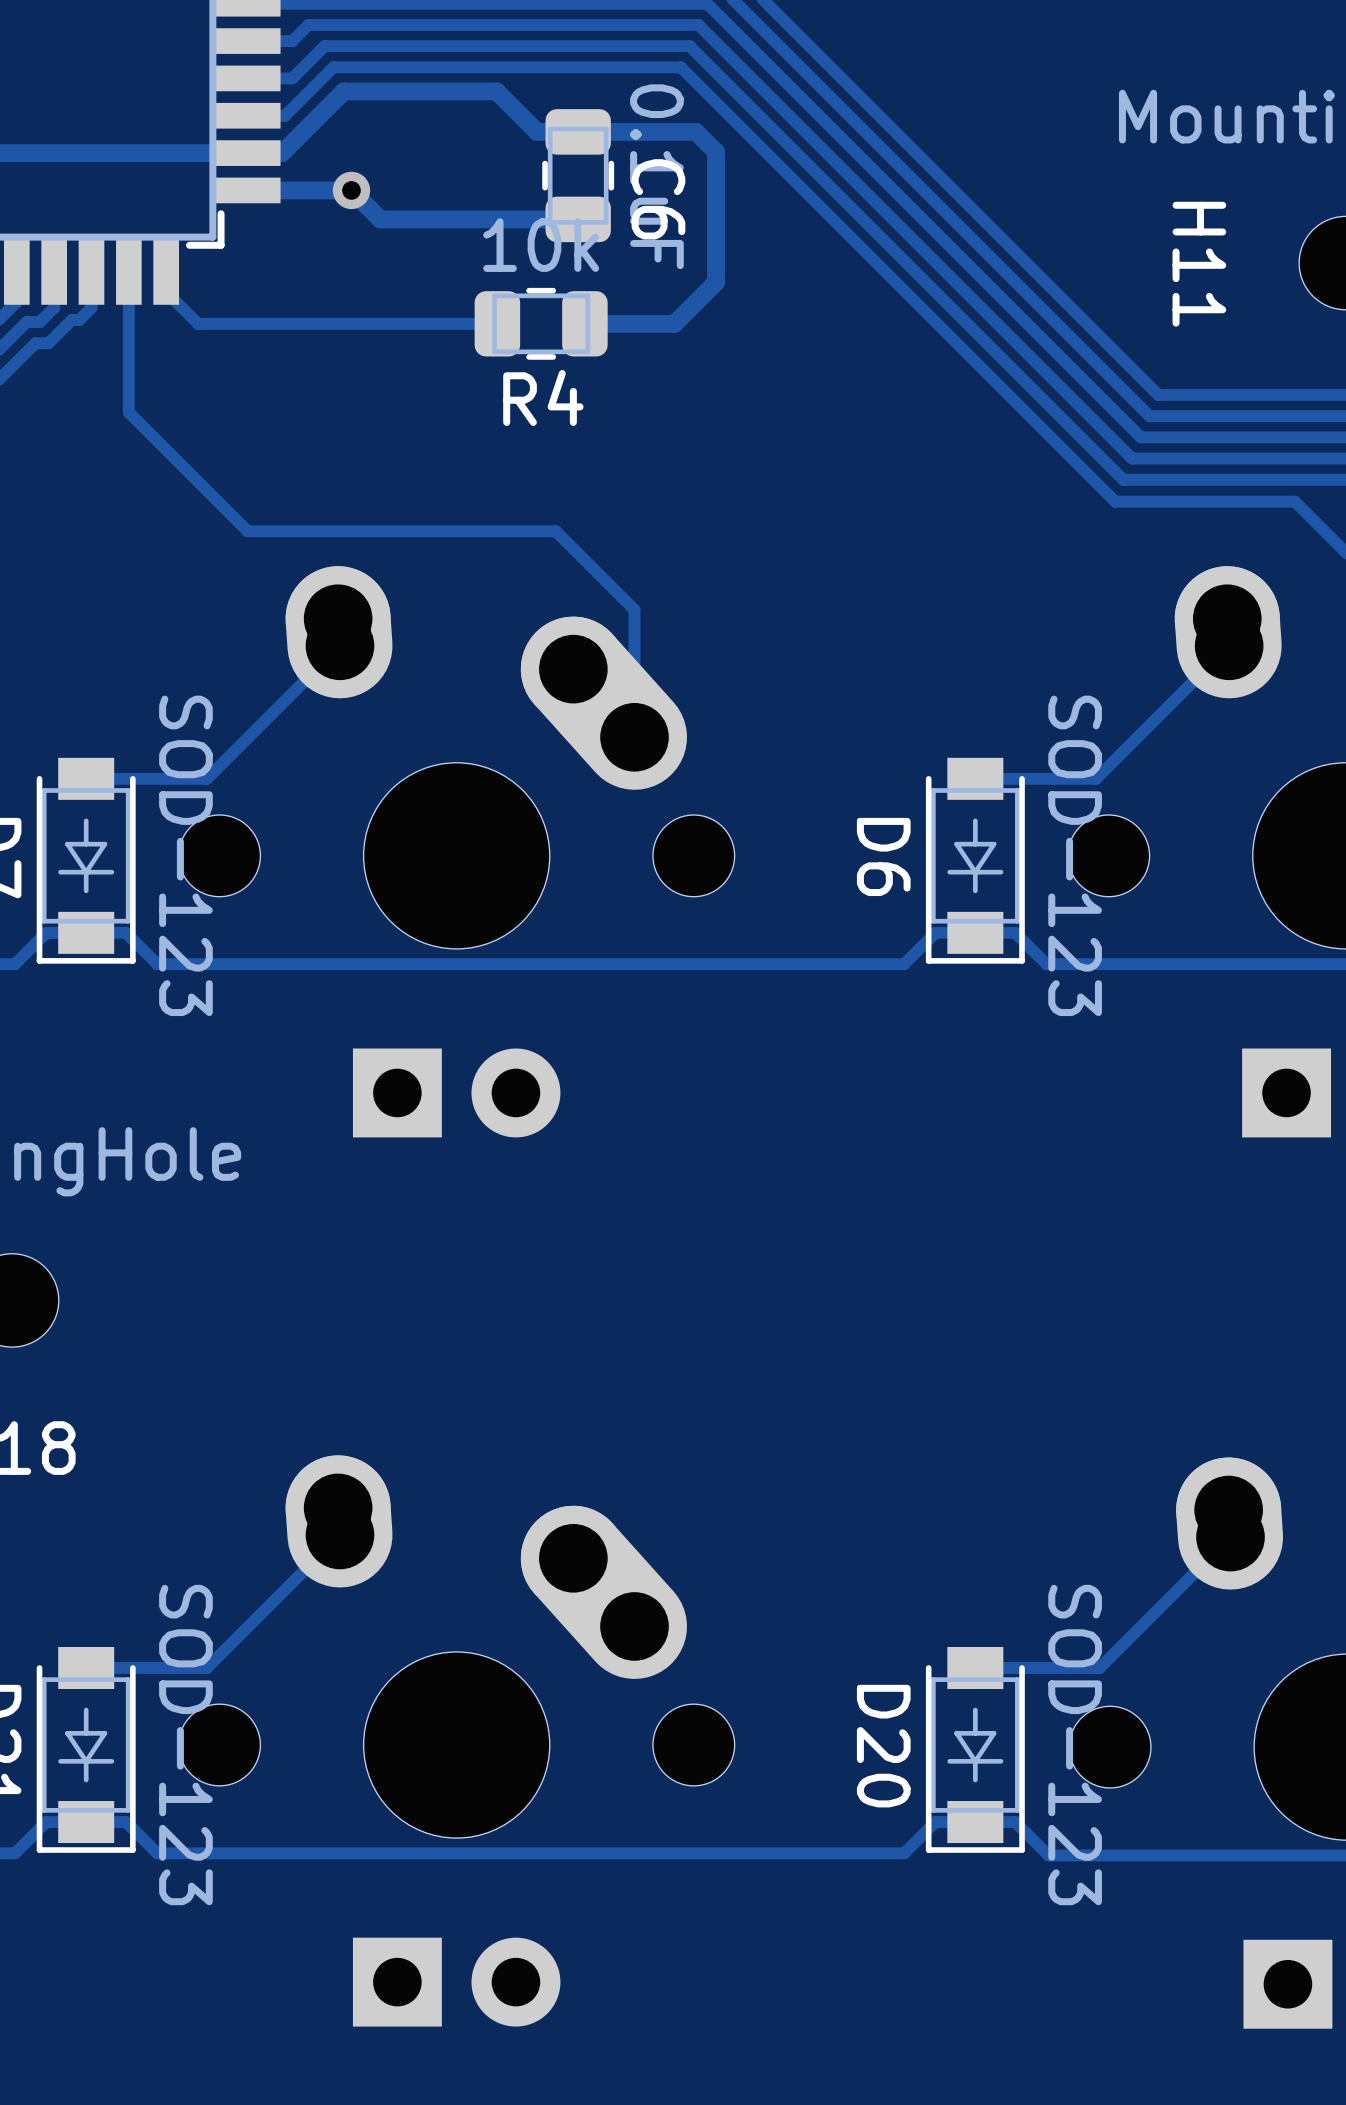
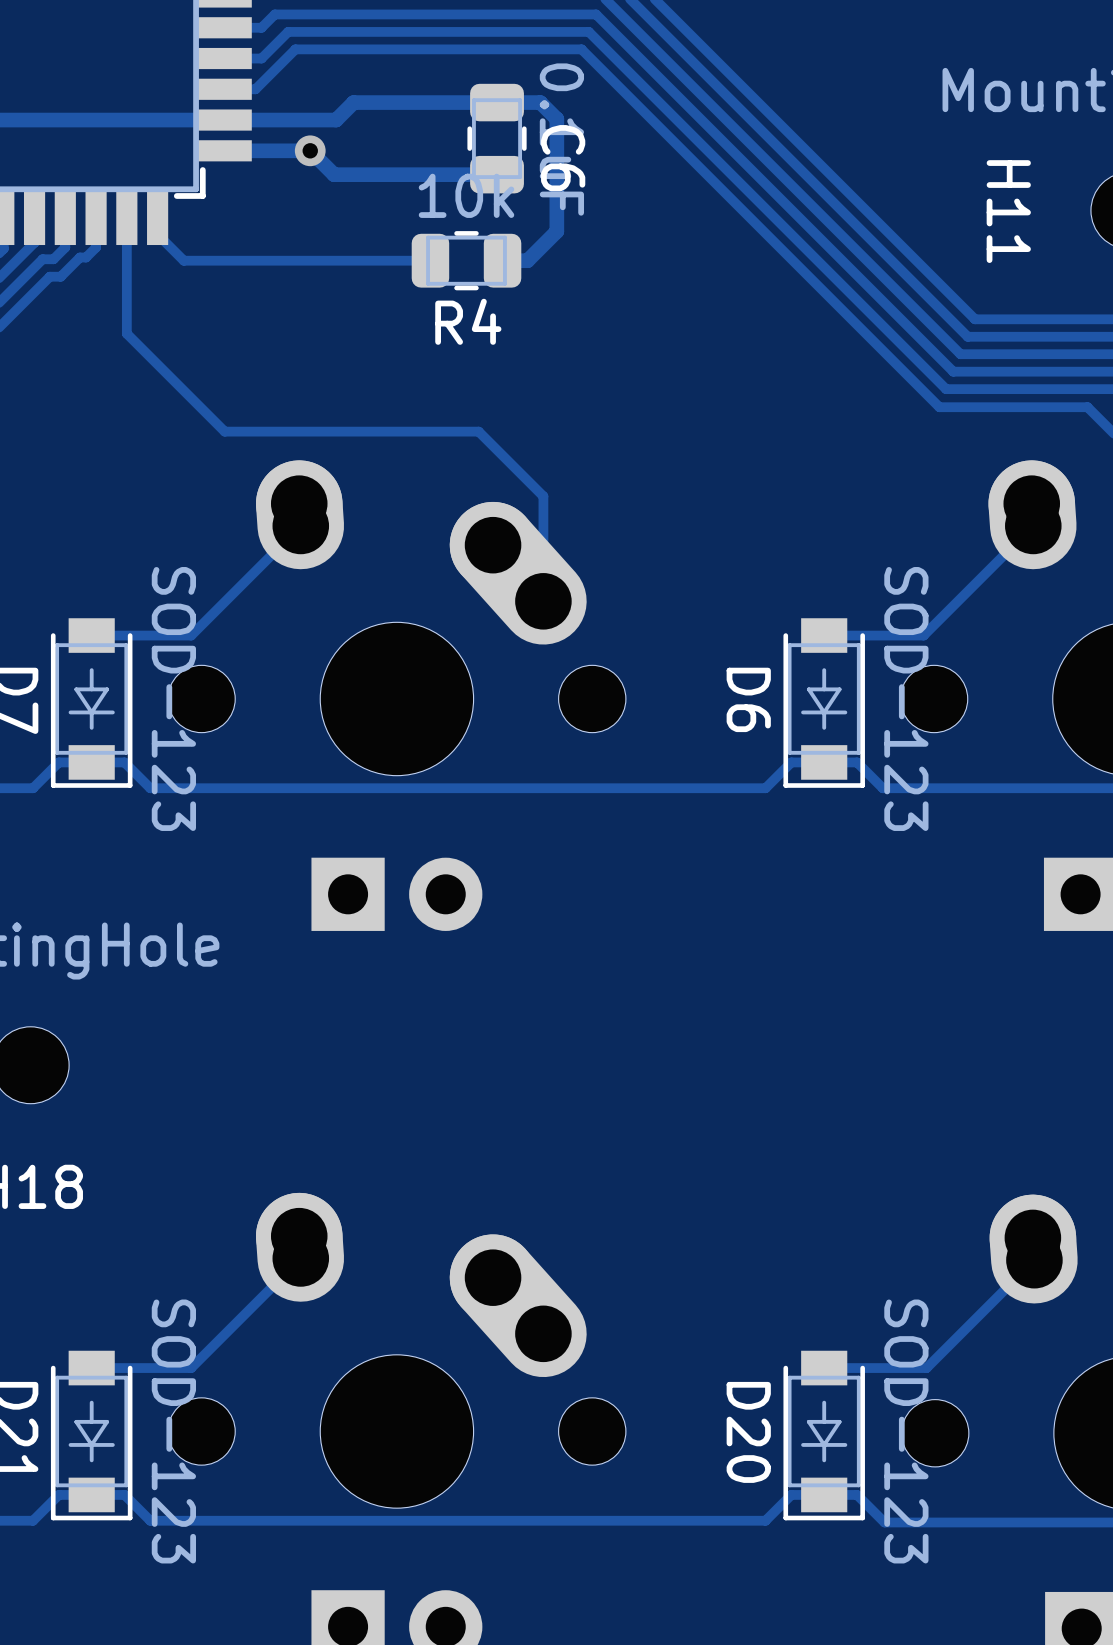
track: (537, 131) (496, 91) (343, 91) (282, 153) -> (463, 102) (353, 102) (336, 120) (253, 120)
track: (630, 131) (695, 131) (716, 151) (716, 282) (674, 323) (615, 323) -> (540, 102) (556, 119) (556, 231) (527, 260)

